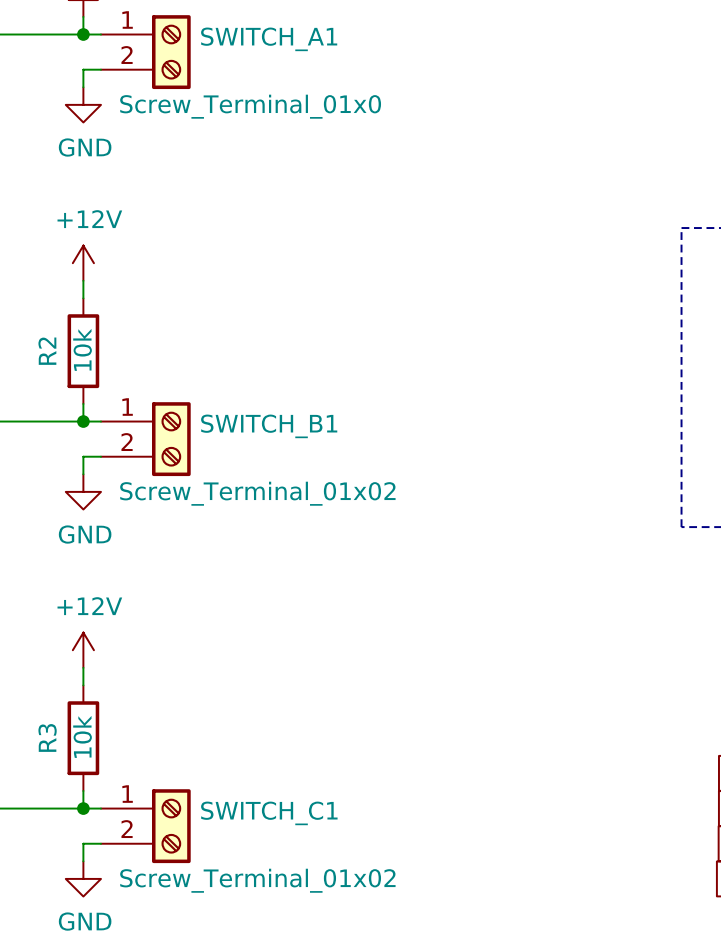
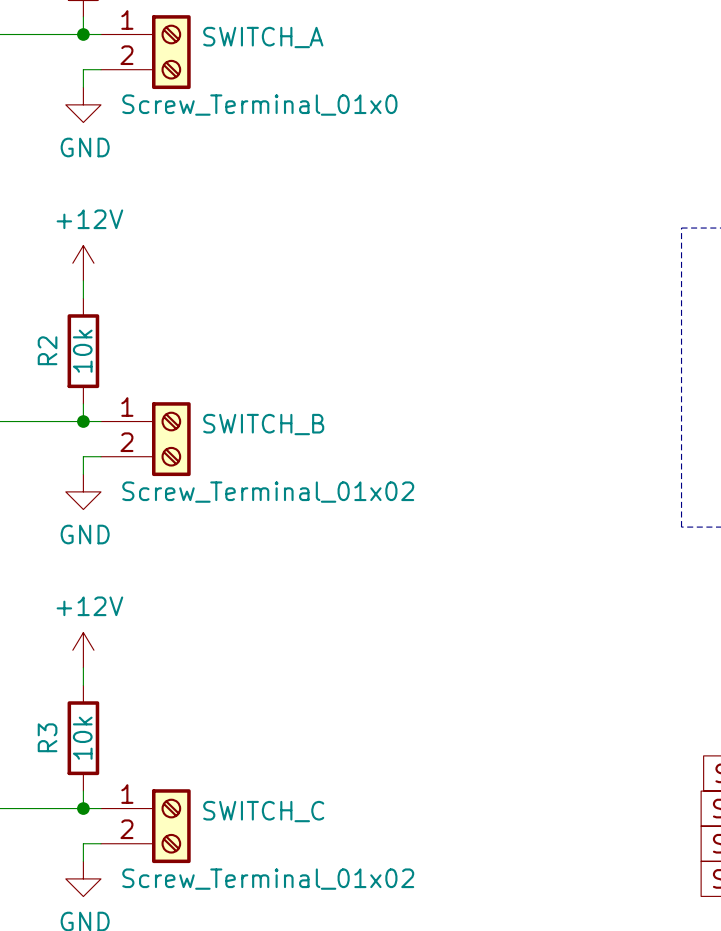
SWITCH_A1 name: SWITCH_A1 (269, 39) -> SWITCH_A (263, 37)
SWITCH_B1 name: SWITCH_B1 (269, 426) -> SWITCH_B (263, 424)
SWITCH_C1 name: SWITCH_C1 (269, 813) -> SWITCH_C (263, 811)

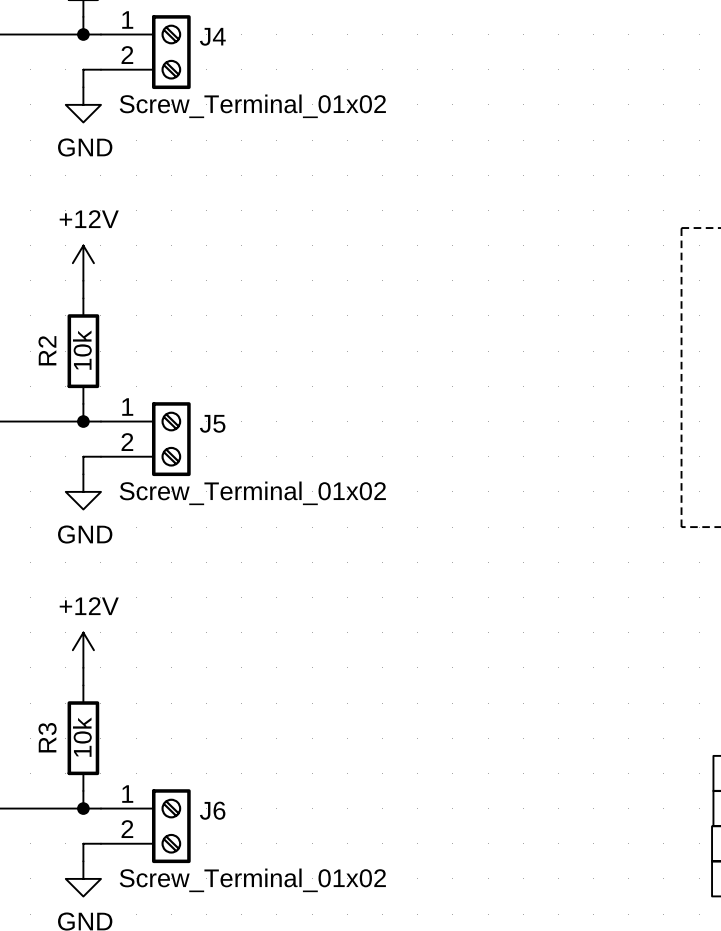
SWITCH_A name: SWITCH_A (263, 37) -> J4 (212, 36)
SWITCH_A value: Screw_Terminal_01x0 (259, 105) -> Screw_Terminal_01x02 (252, 106)
SWITCH_B name: SWITCH_B (263, 424) -> J5 (212, 423)
SWITCH_C name: SWITCH_C (263, 811) -> J6 (212, 810)

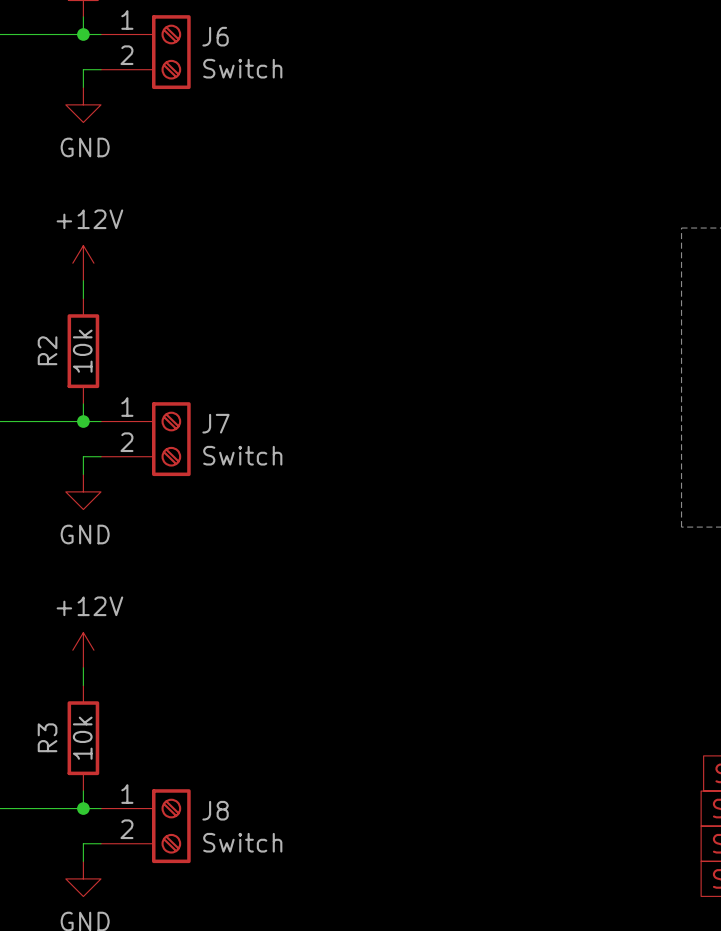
J4 name: J4 (212, 36) -> J6 (215, 36)
J4 value: Screw_Terminal_01x02 (252, 106) -> Switch (242, 68)
J5 name: J5 (212, 423) -> J7 (215, 423)
J5 value: Screw_Terminal_01x02 (252, 493) -> Switch (242, 455)
J6 name: J6 (212, 810) -> J8 (215, 810)
J6 value: Screw_Terminal_01x02 (252, 880) -> Switch (242, 842)

